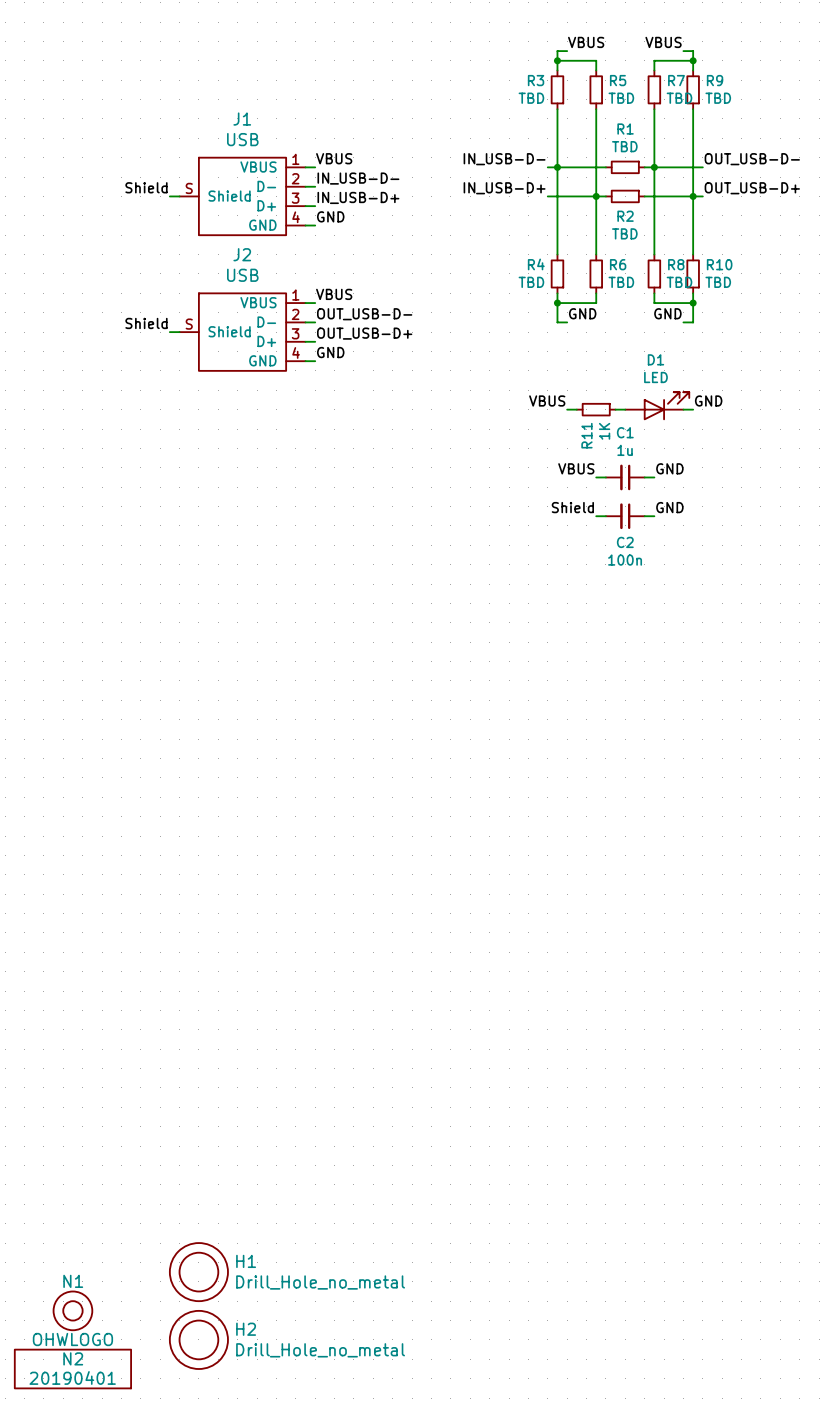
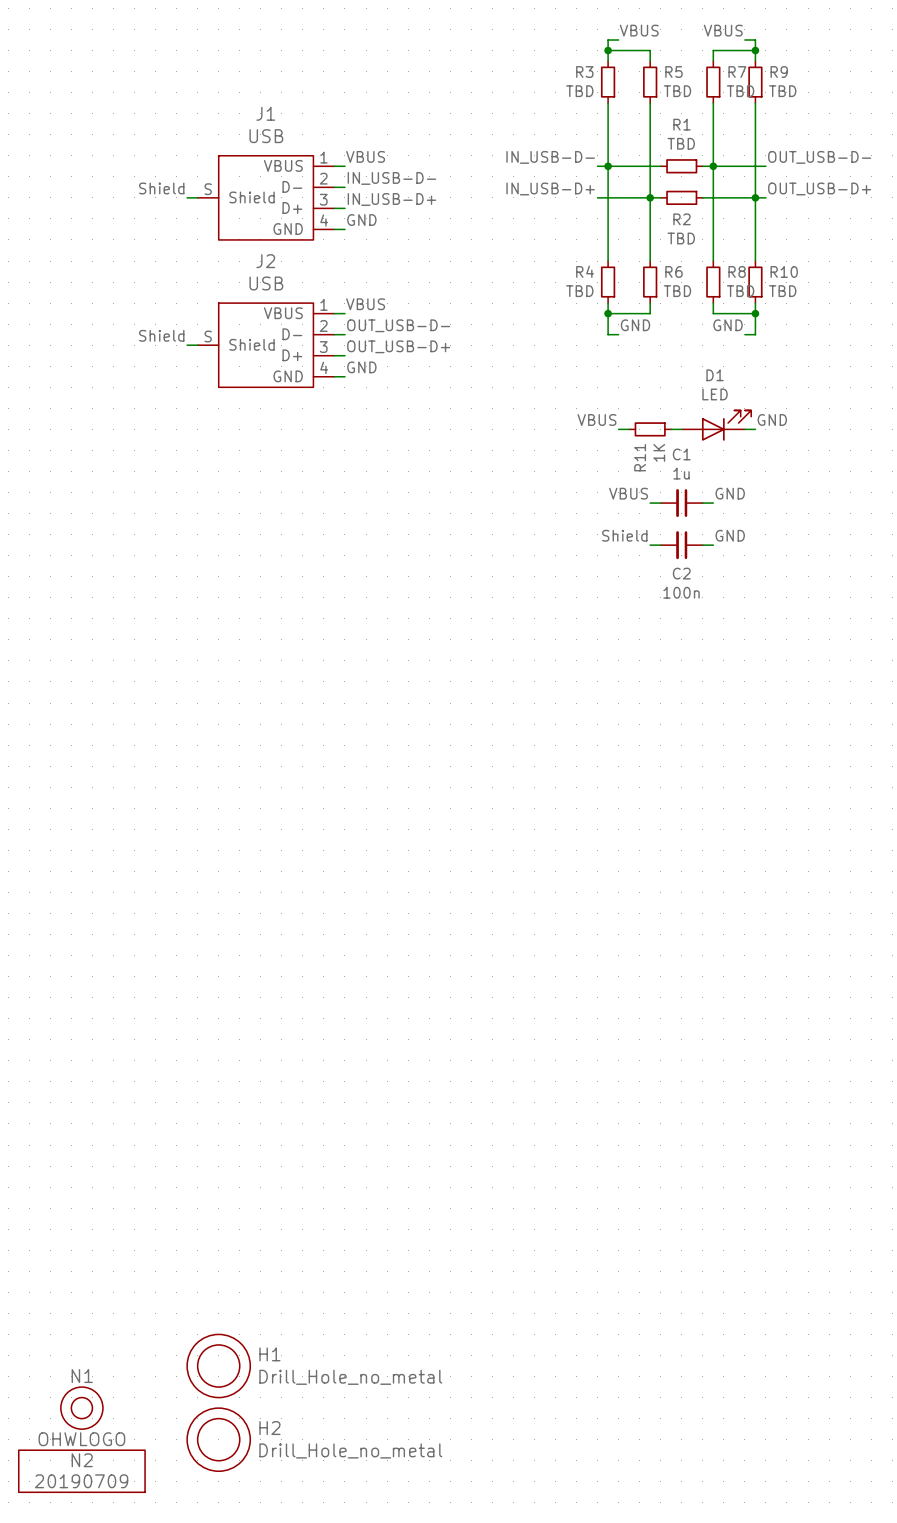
N2 value: 20190401 (72, 1377) -> 20190709 (81, 1481)

